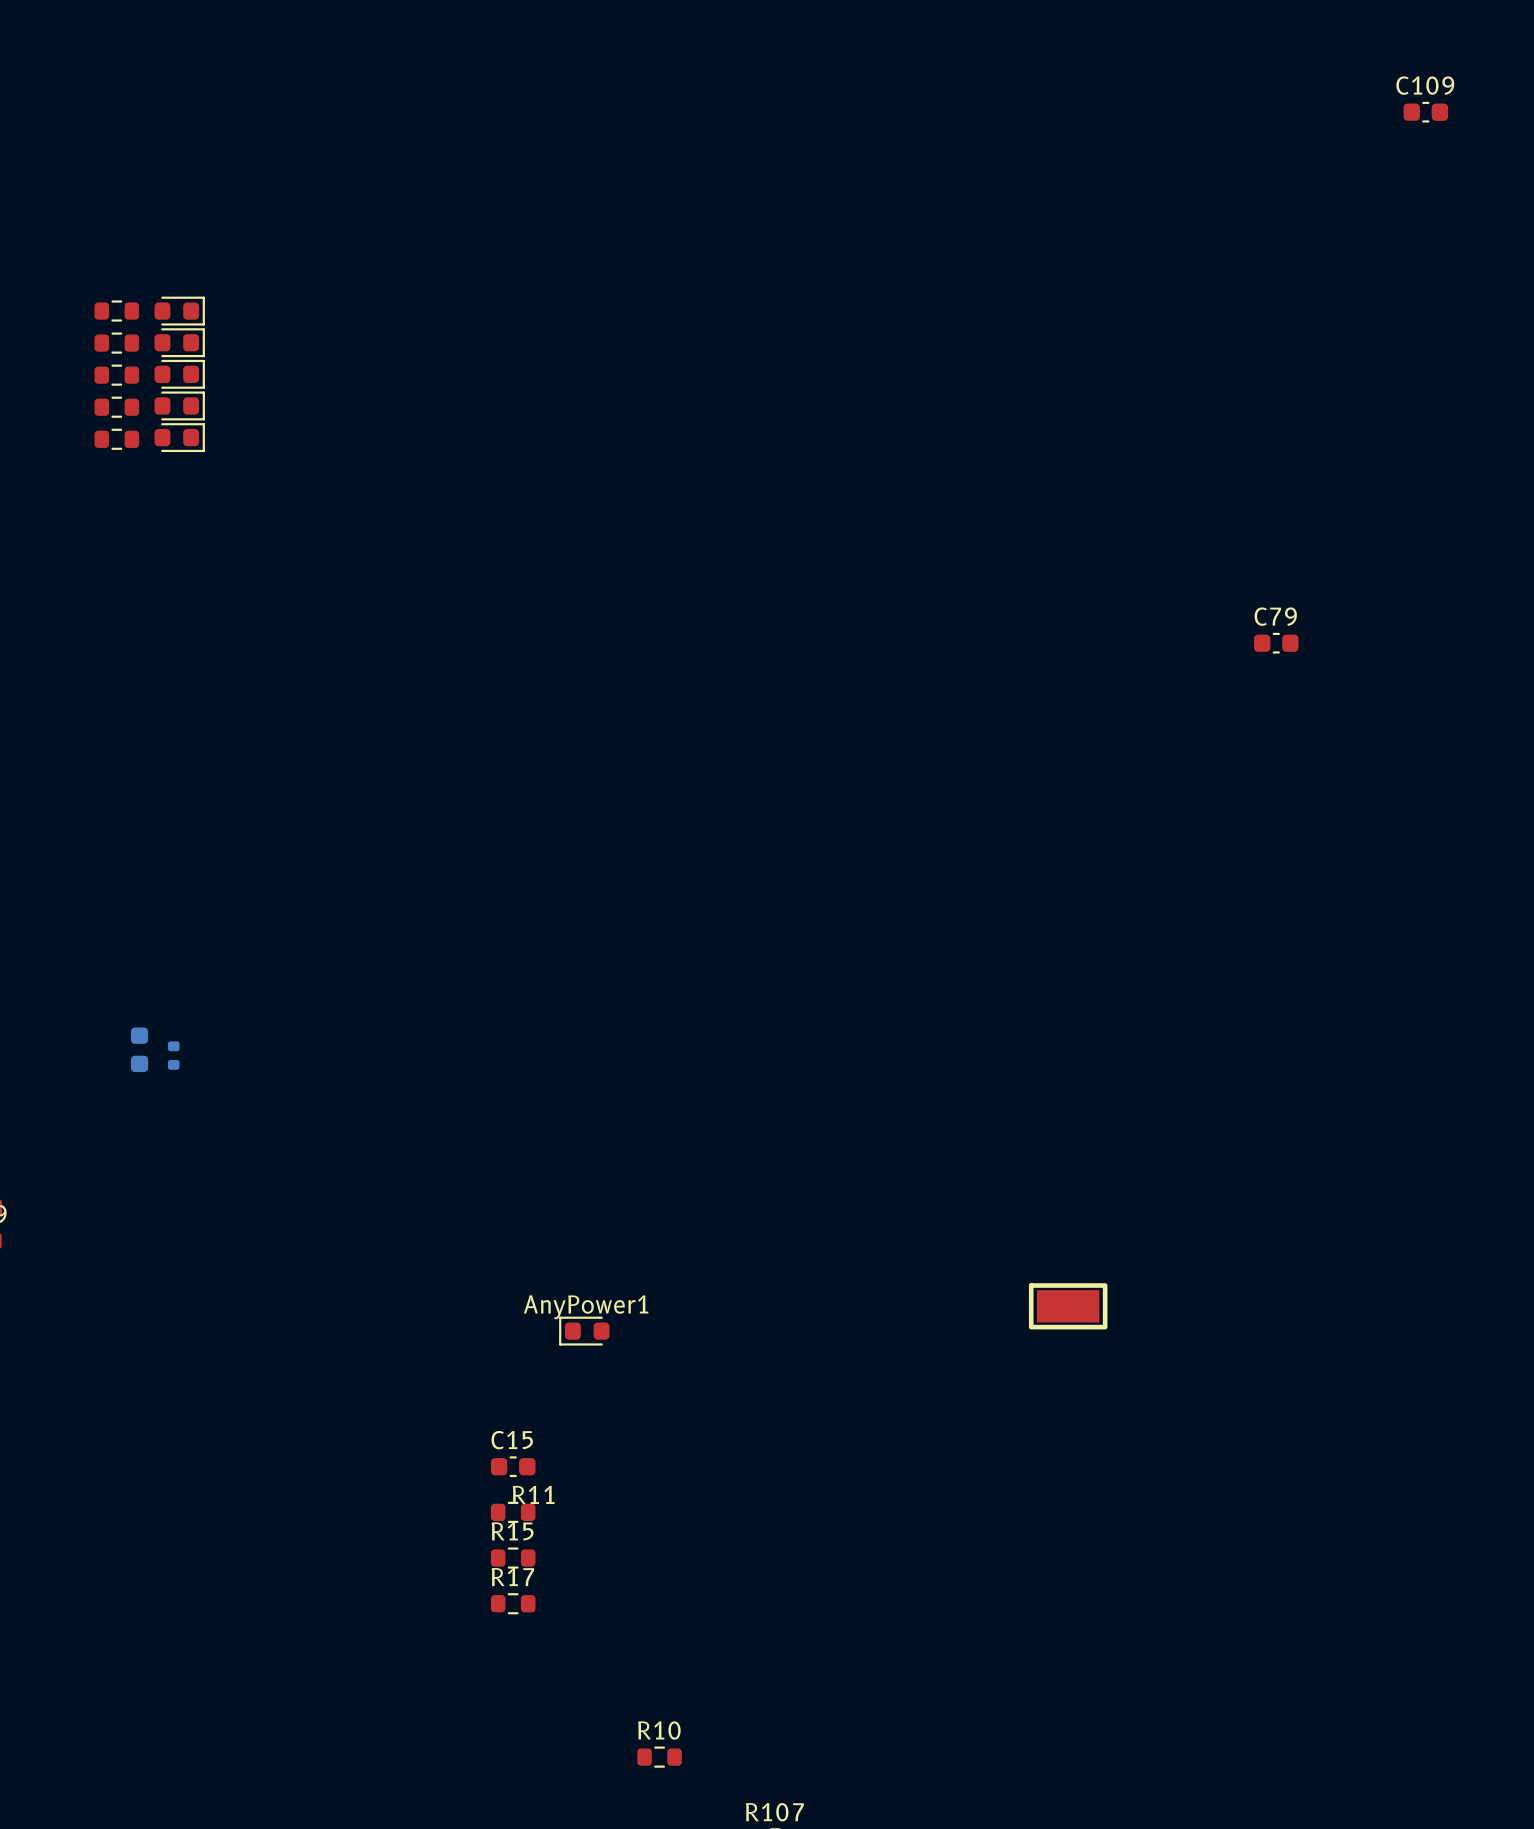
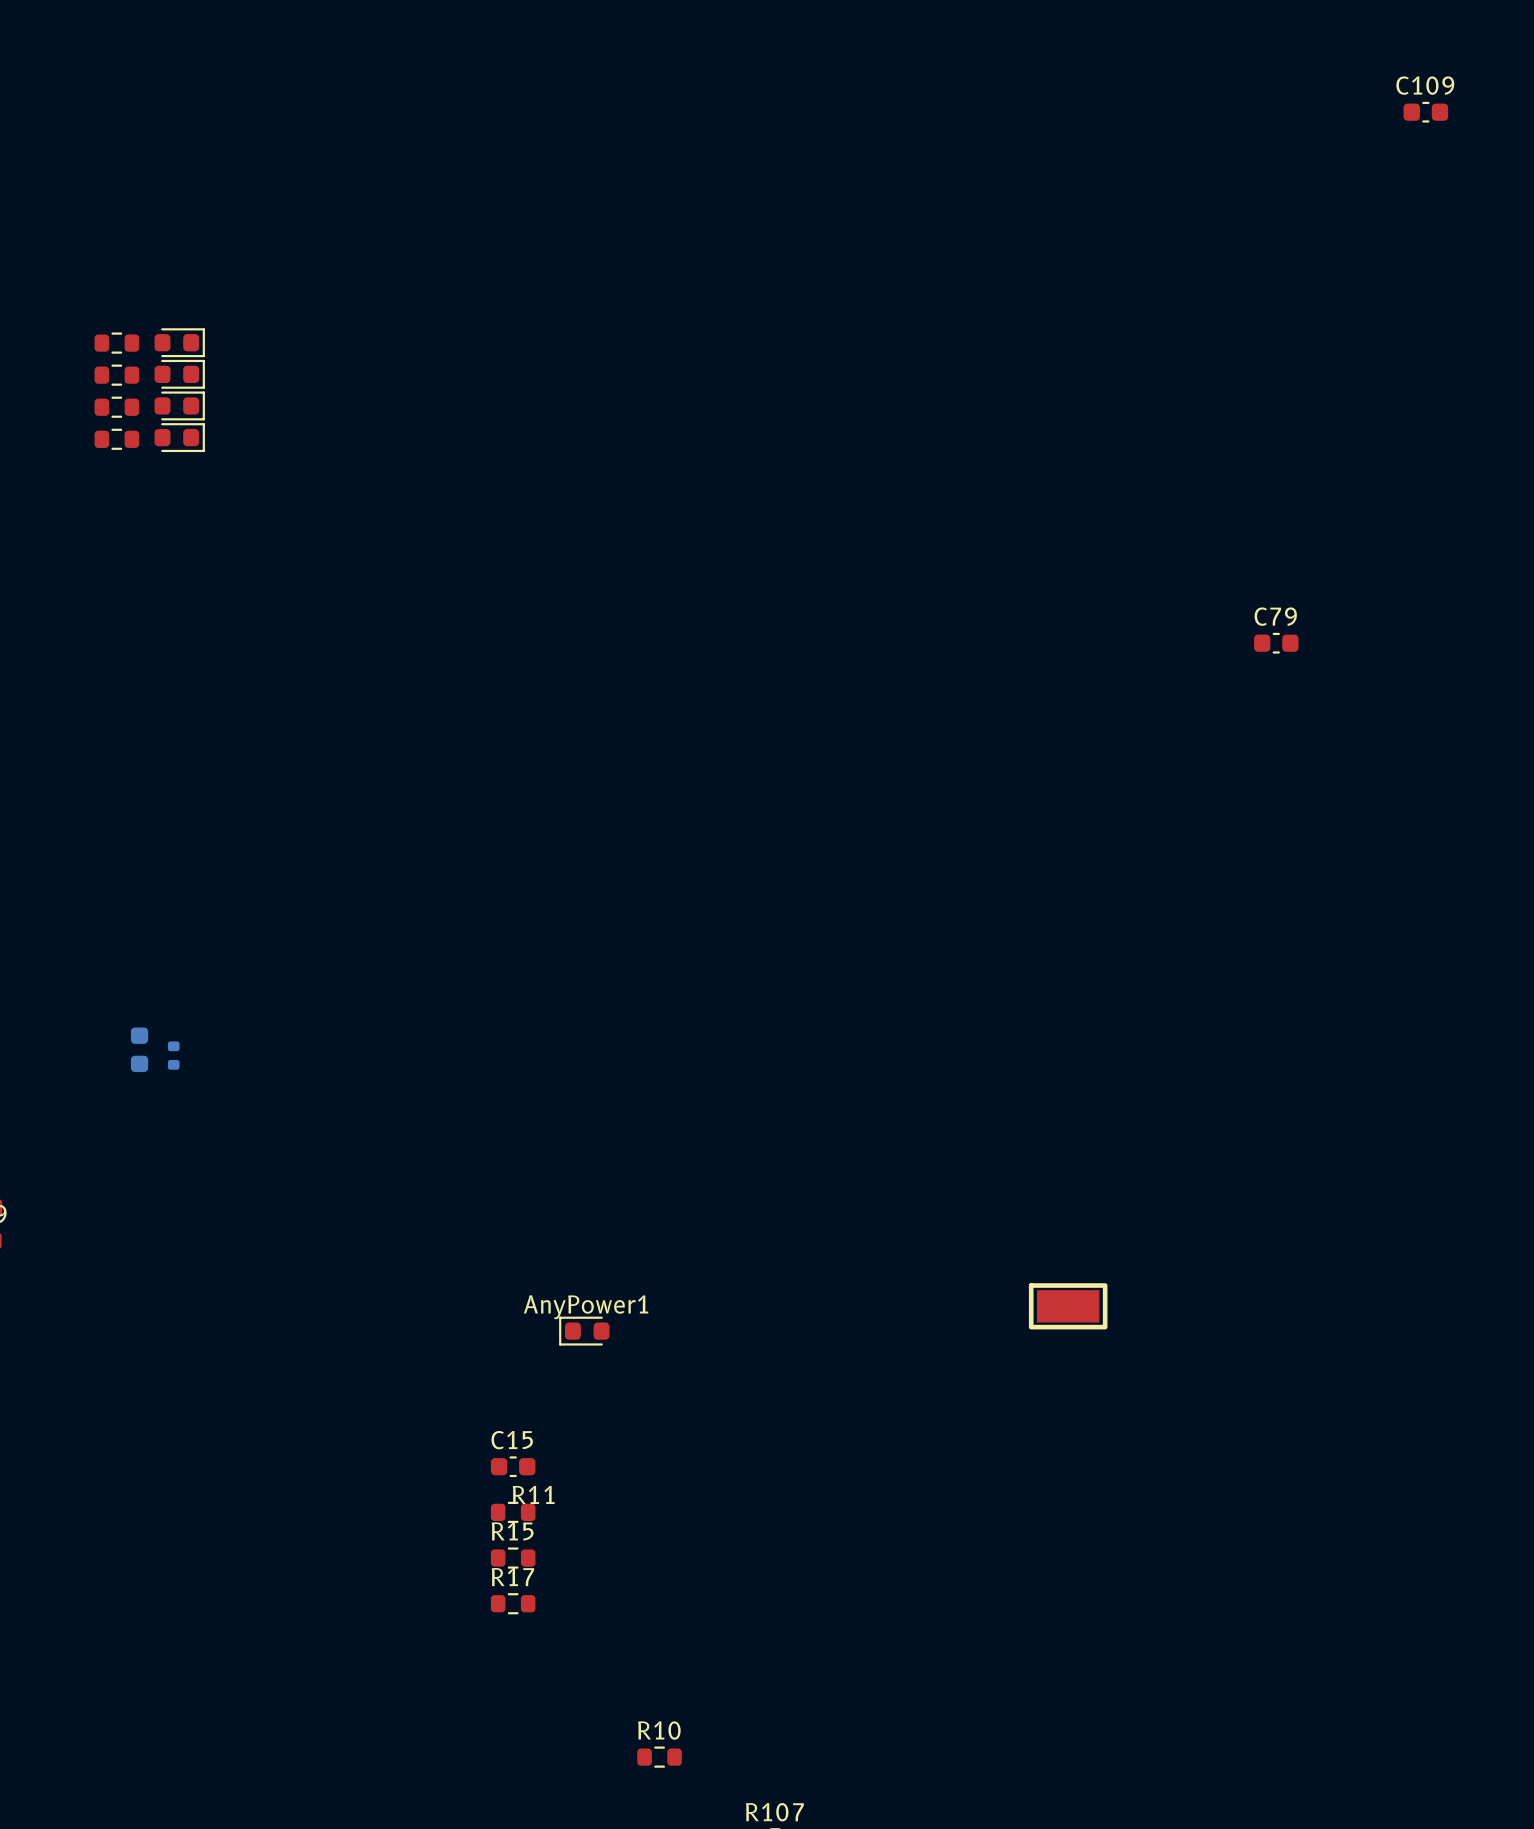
part: (116, 311) -> none
part: (179, 311) -> none

